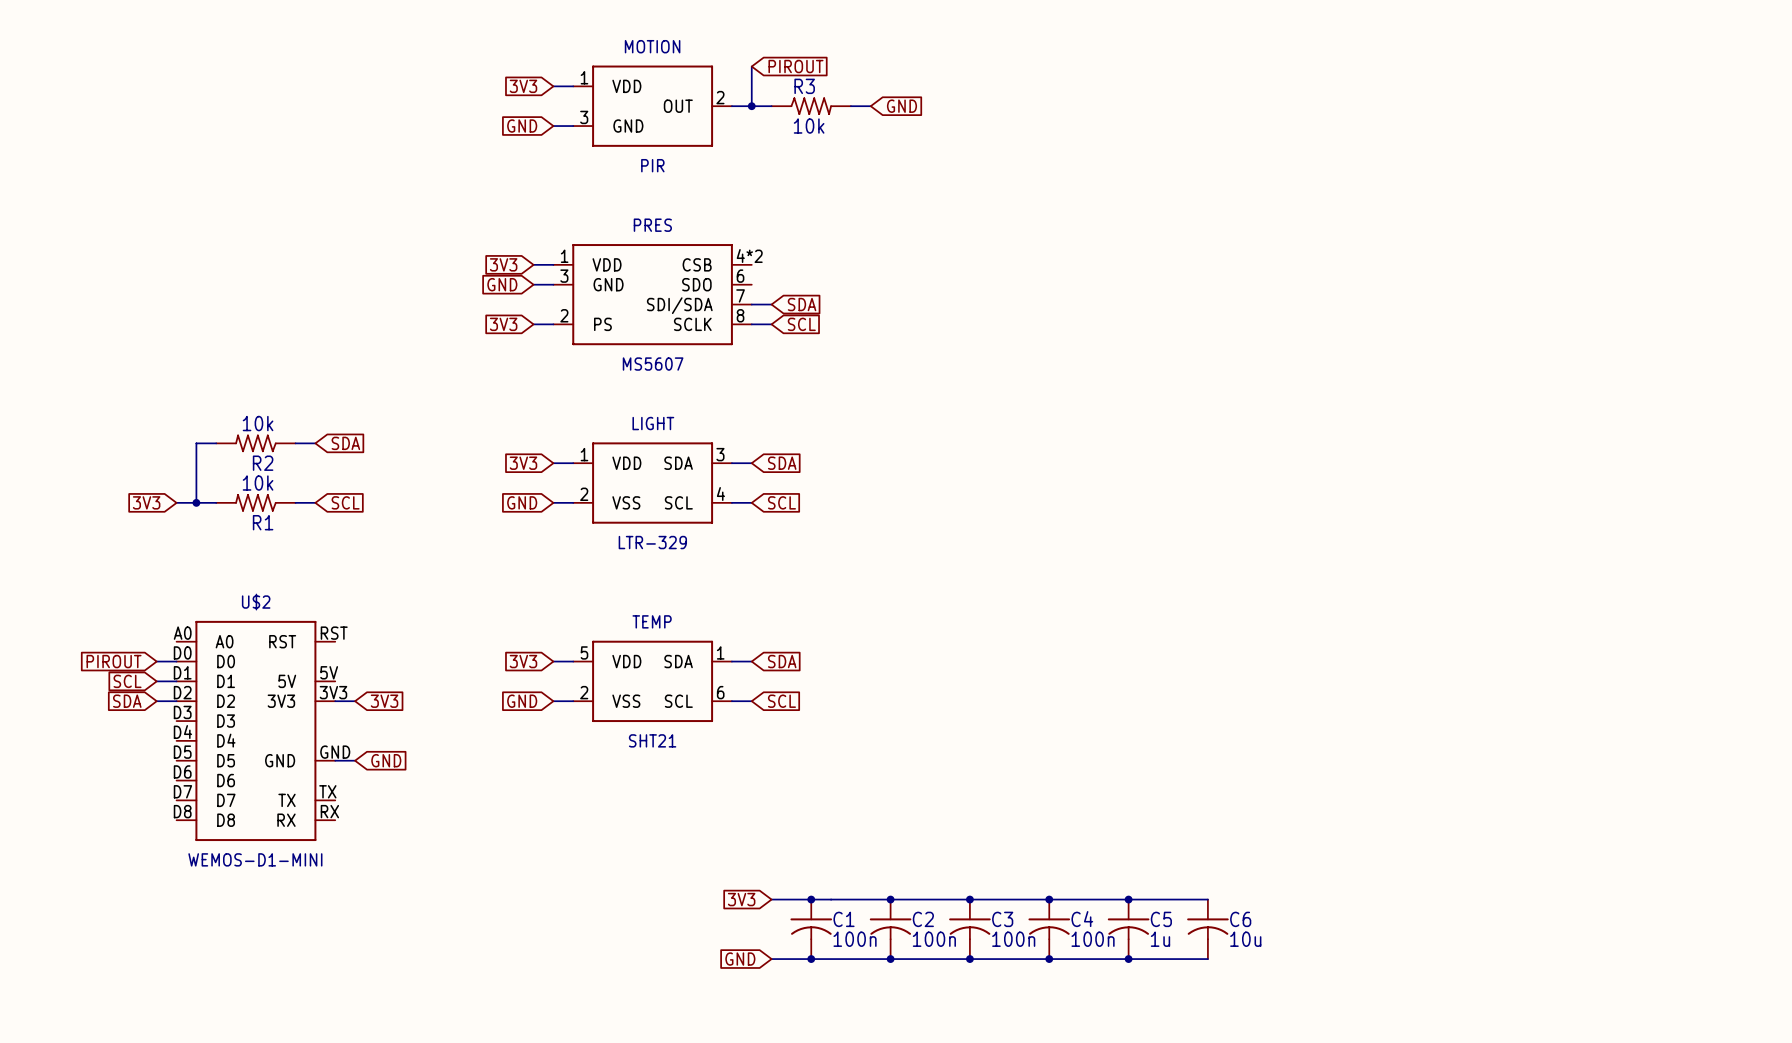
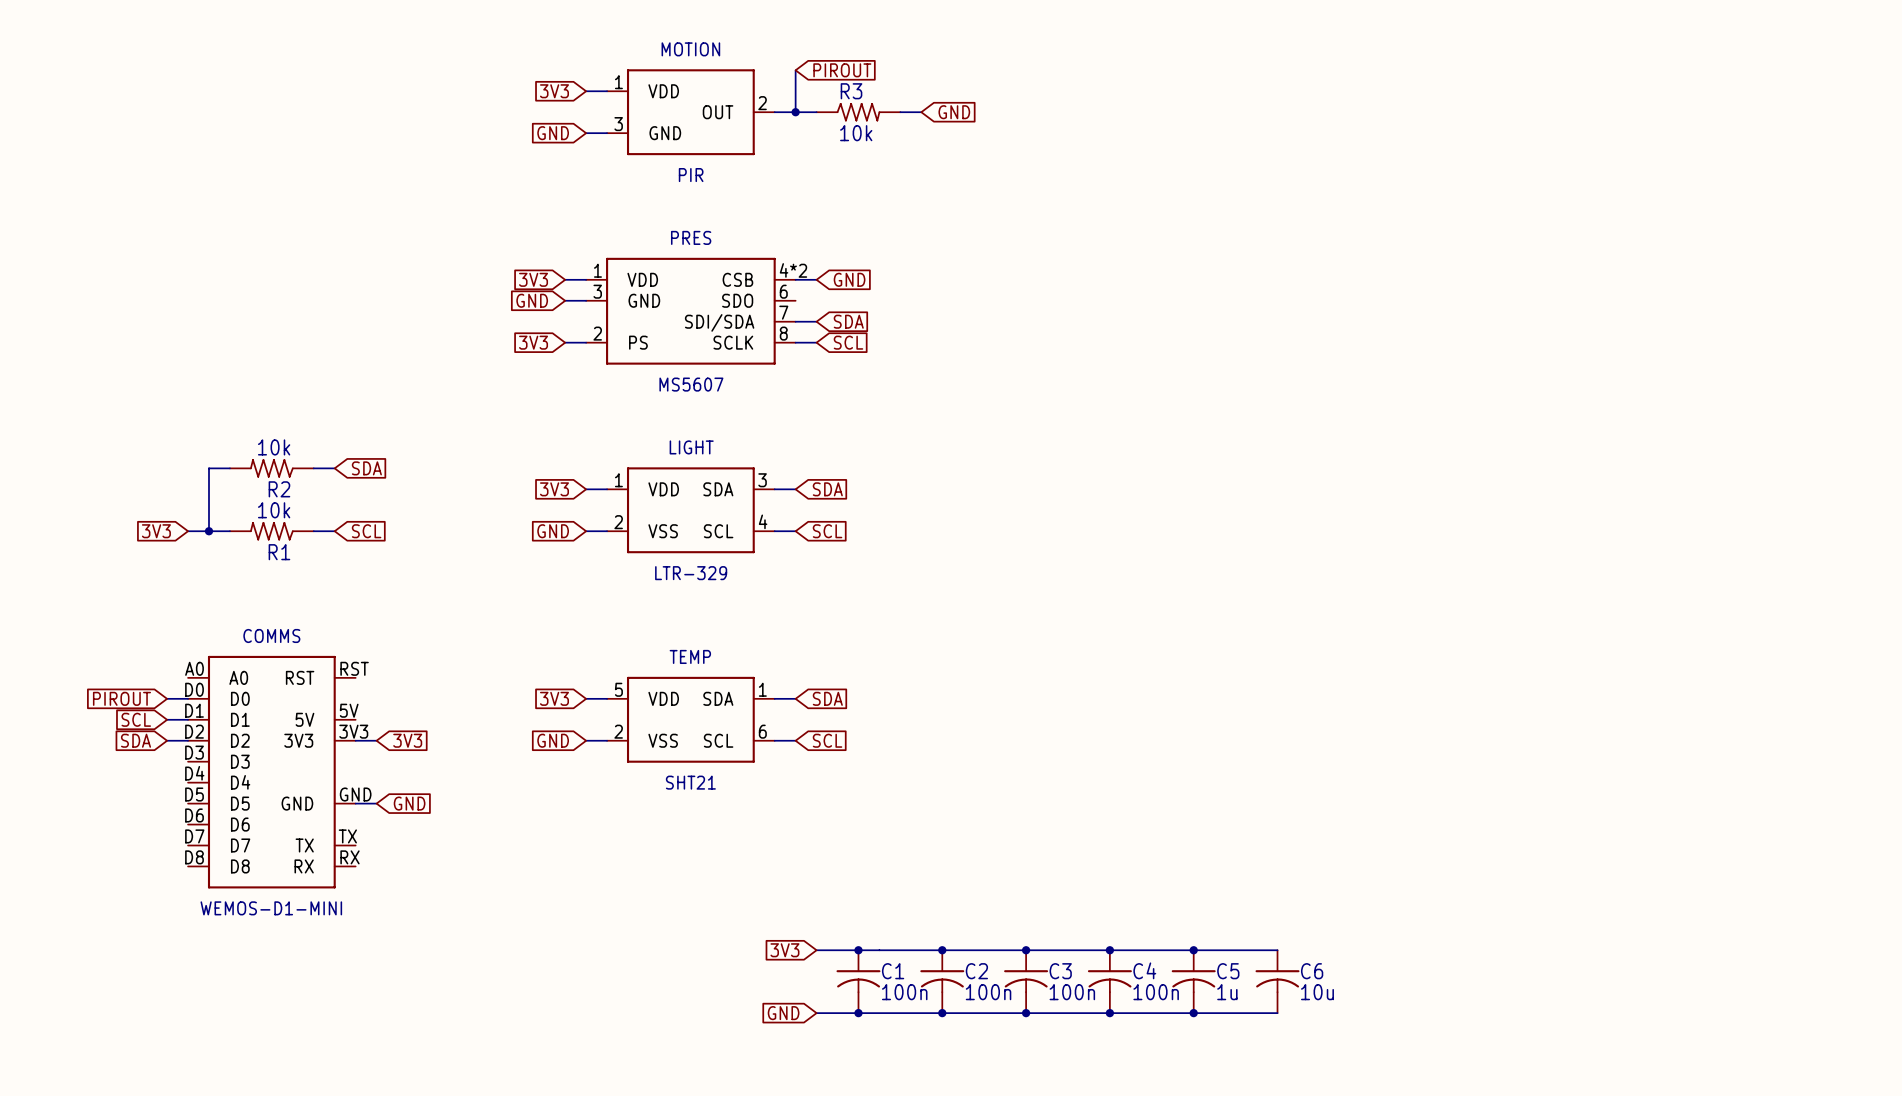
wire: none -> (795, 279) (816, 279)
global label: none -> GND (849, 279)
U$2 name: U$2 (256, 602) -> COMMS (271, 635)

